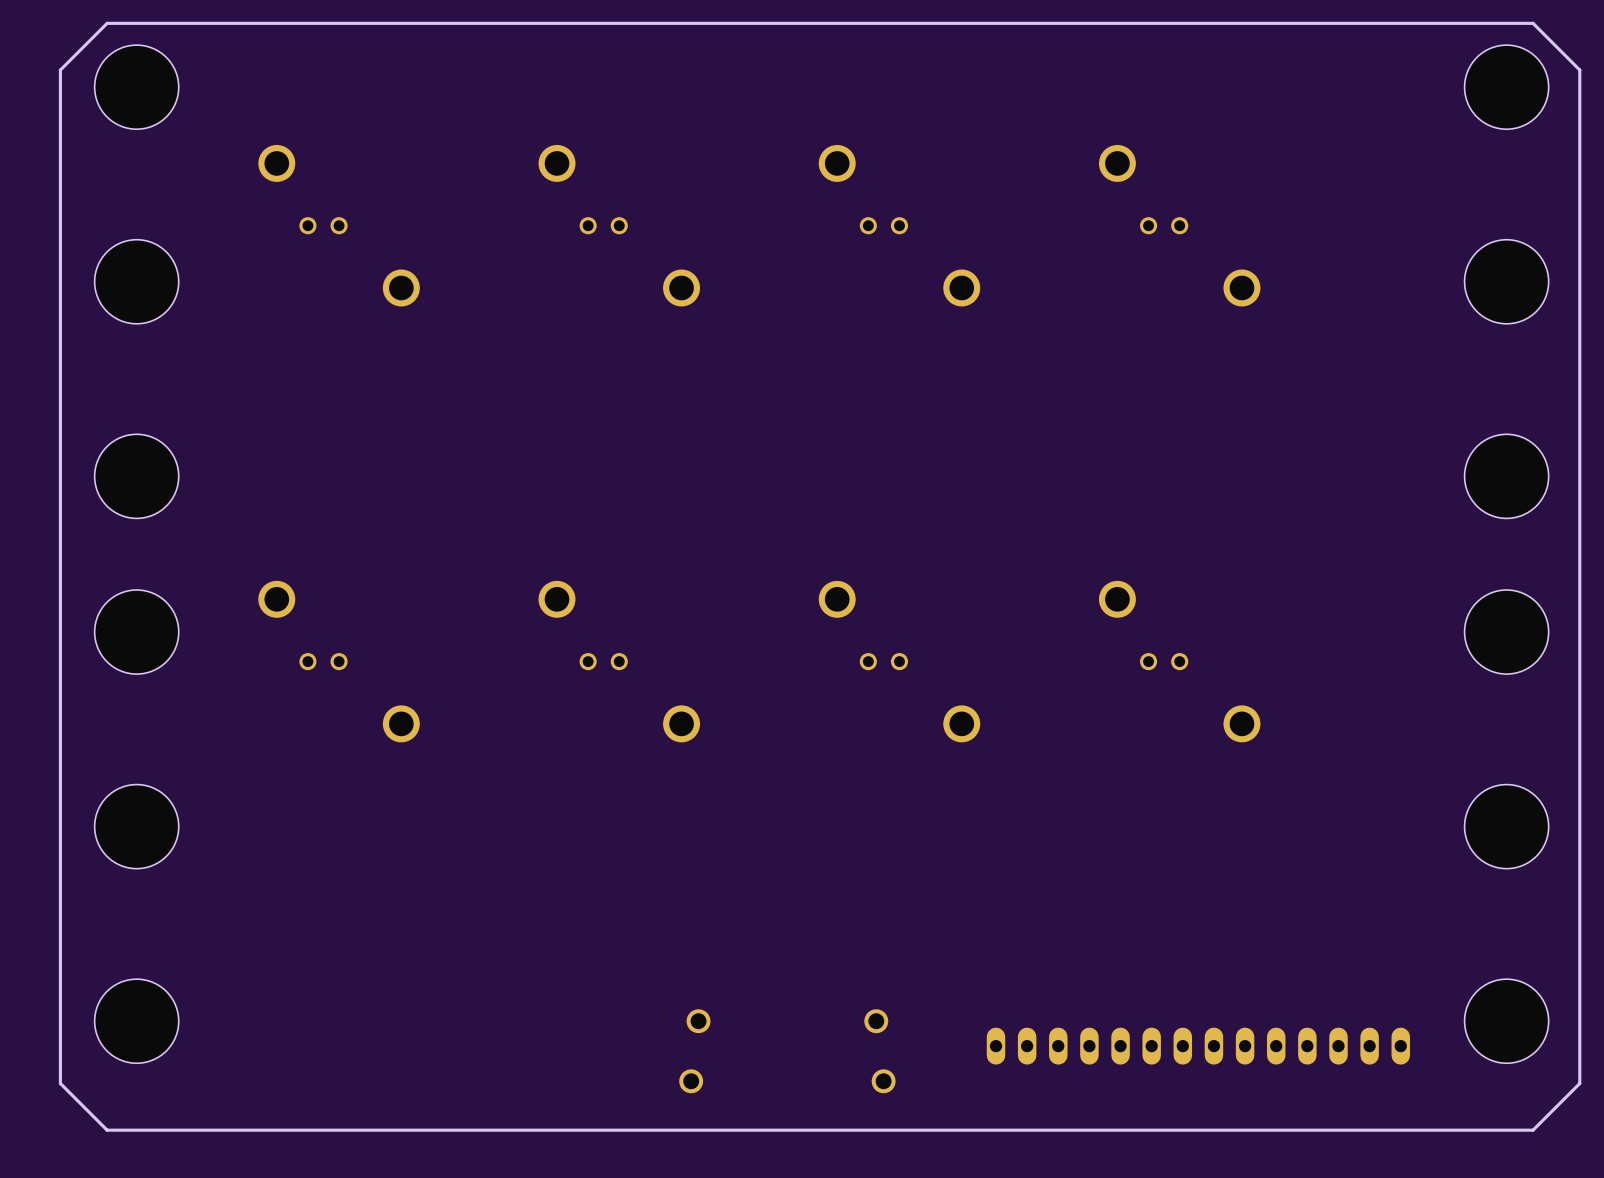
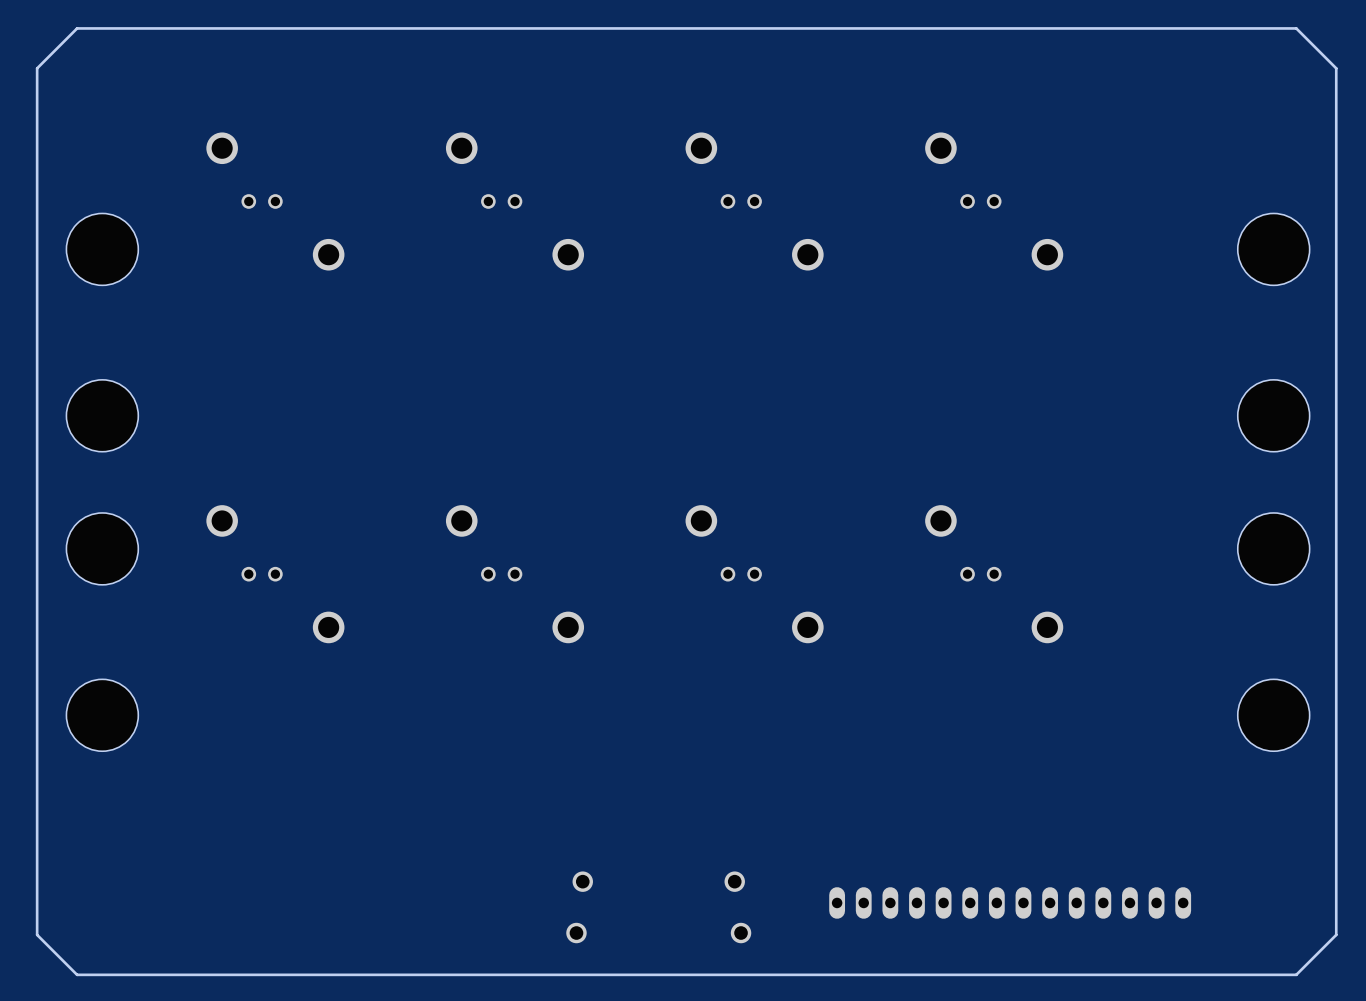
hole: (136, 87) -> none
hole: (1506, 87) -> none
hole: (136, 1021) -> none
hole: (1506, 1021) -> none

